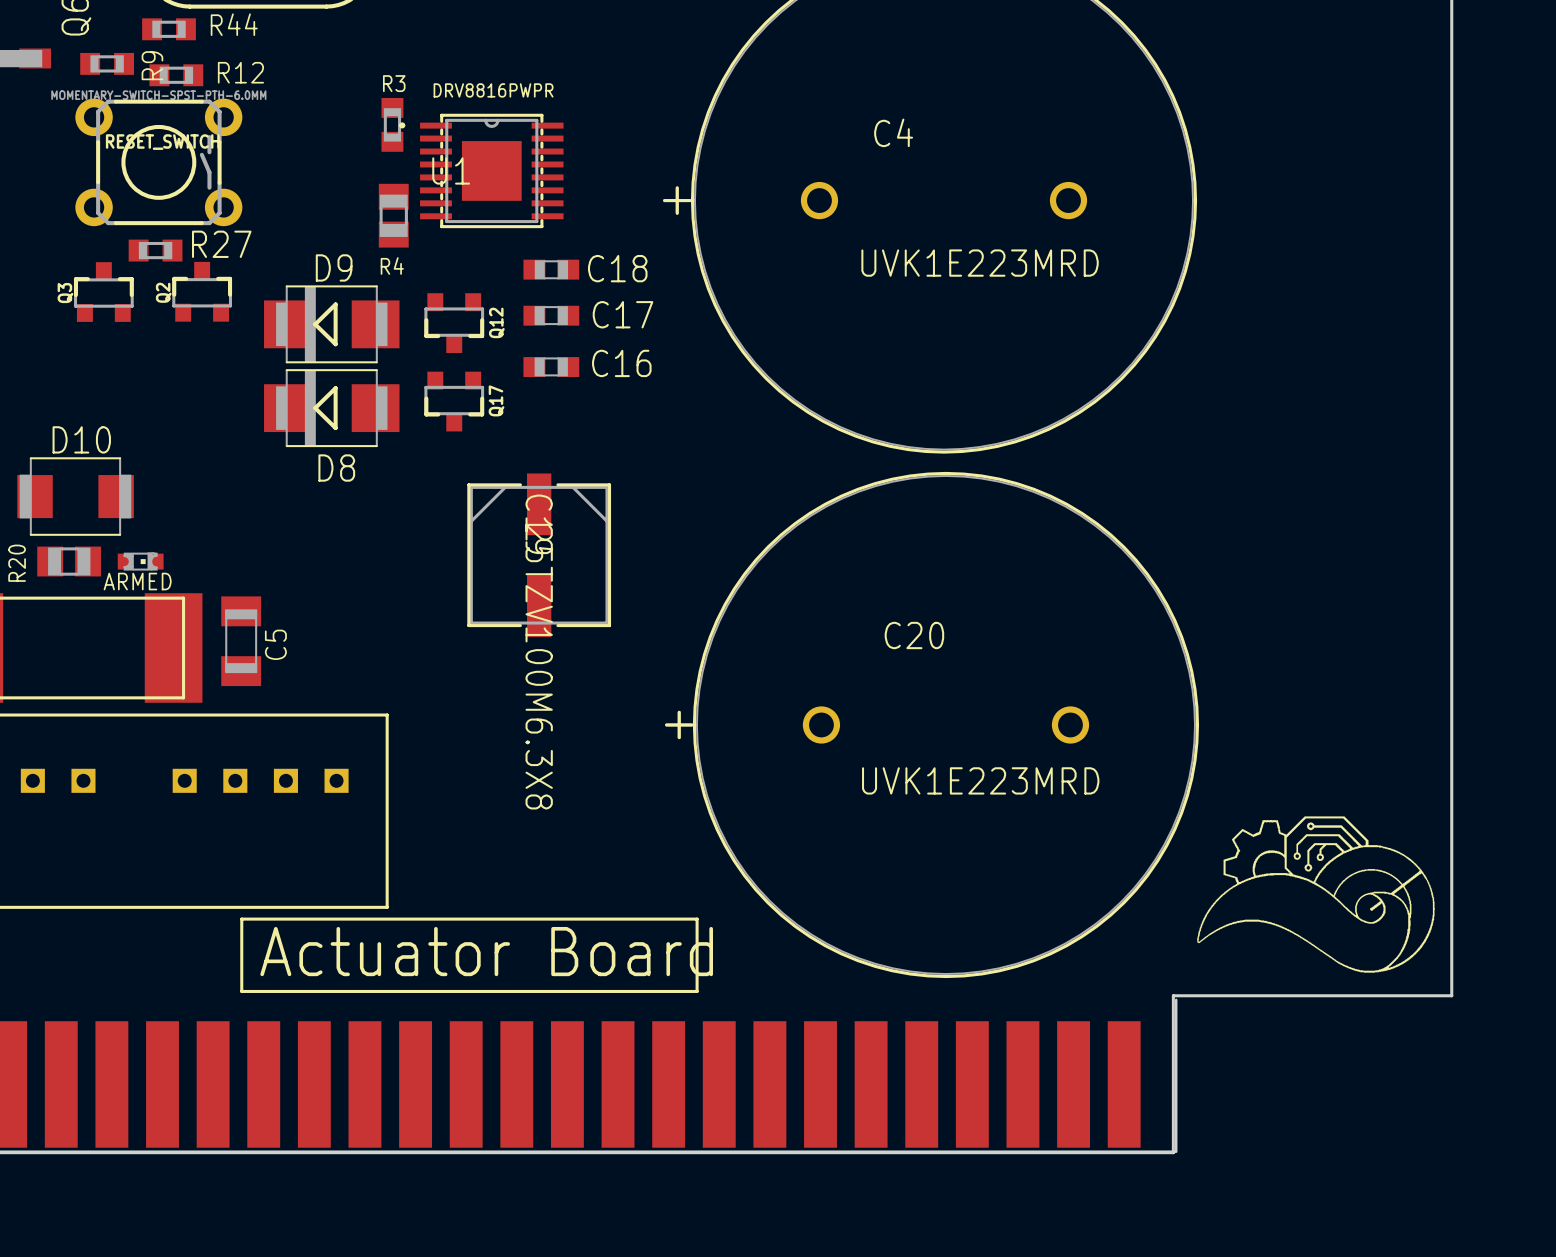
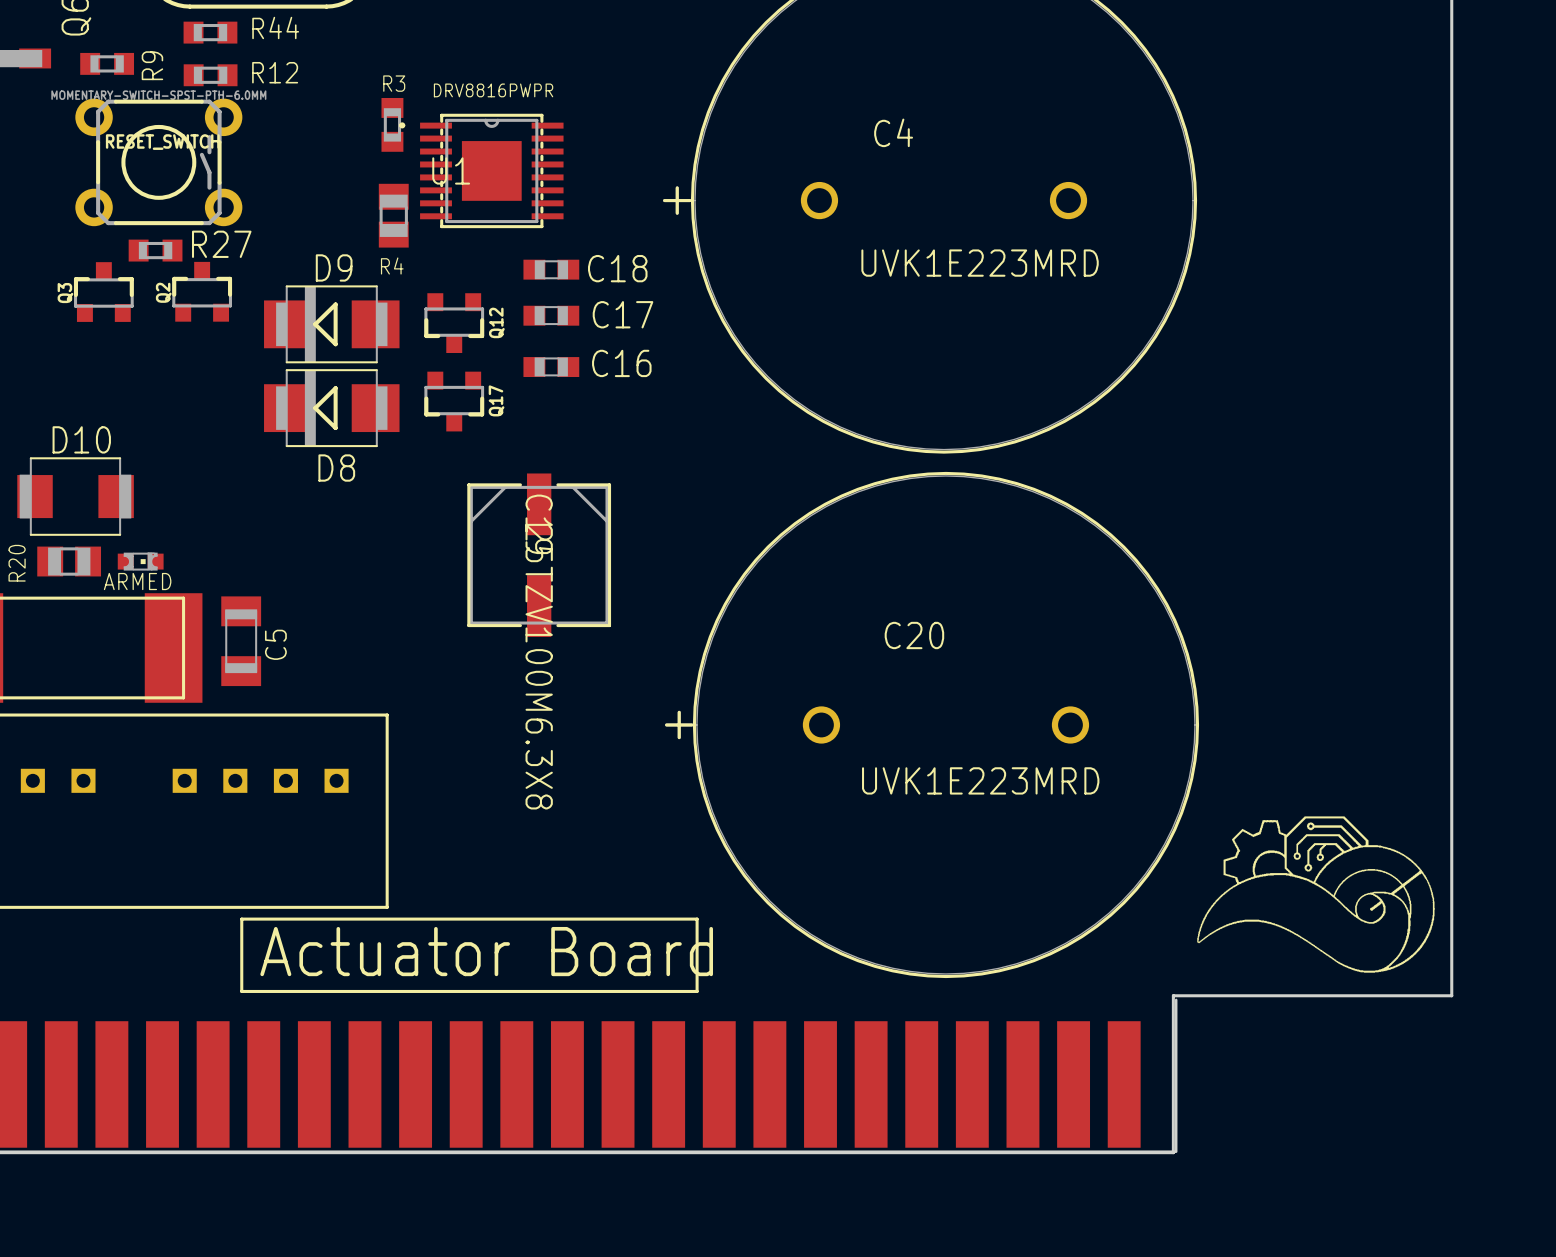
R44 position: (169, 29) -> (210, 32)
R12 position: (176, 75) -> (210, 75)

